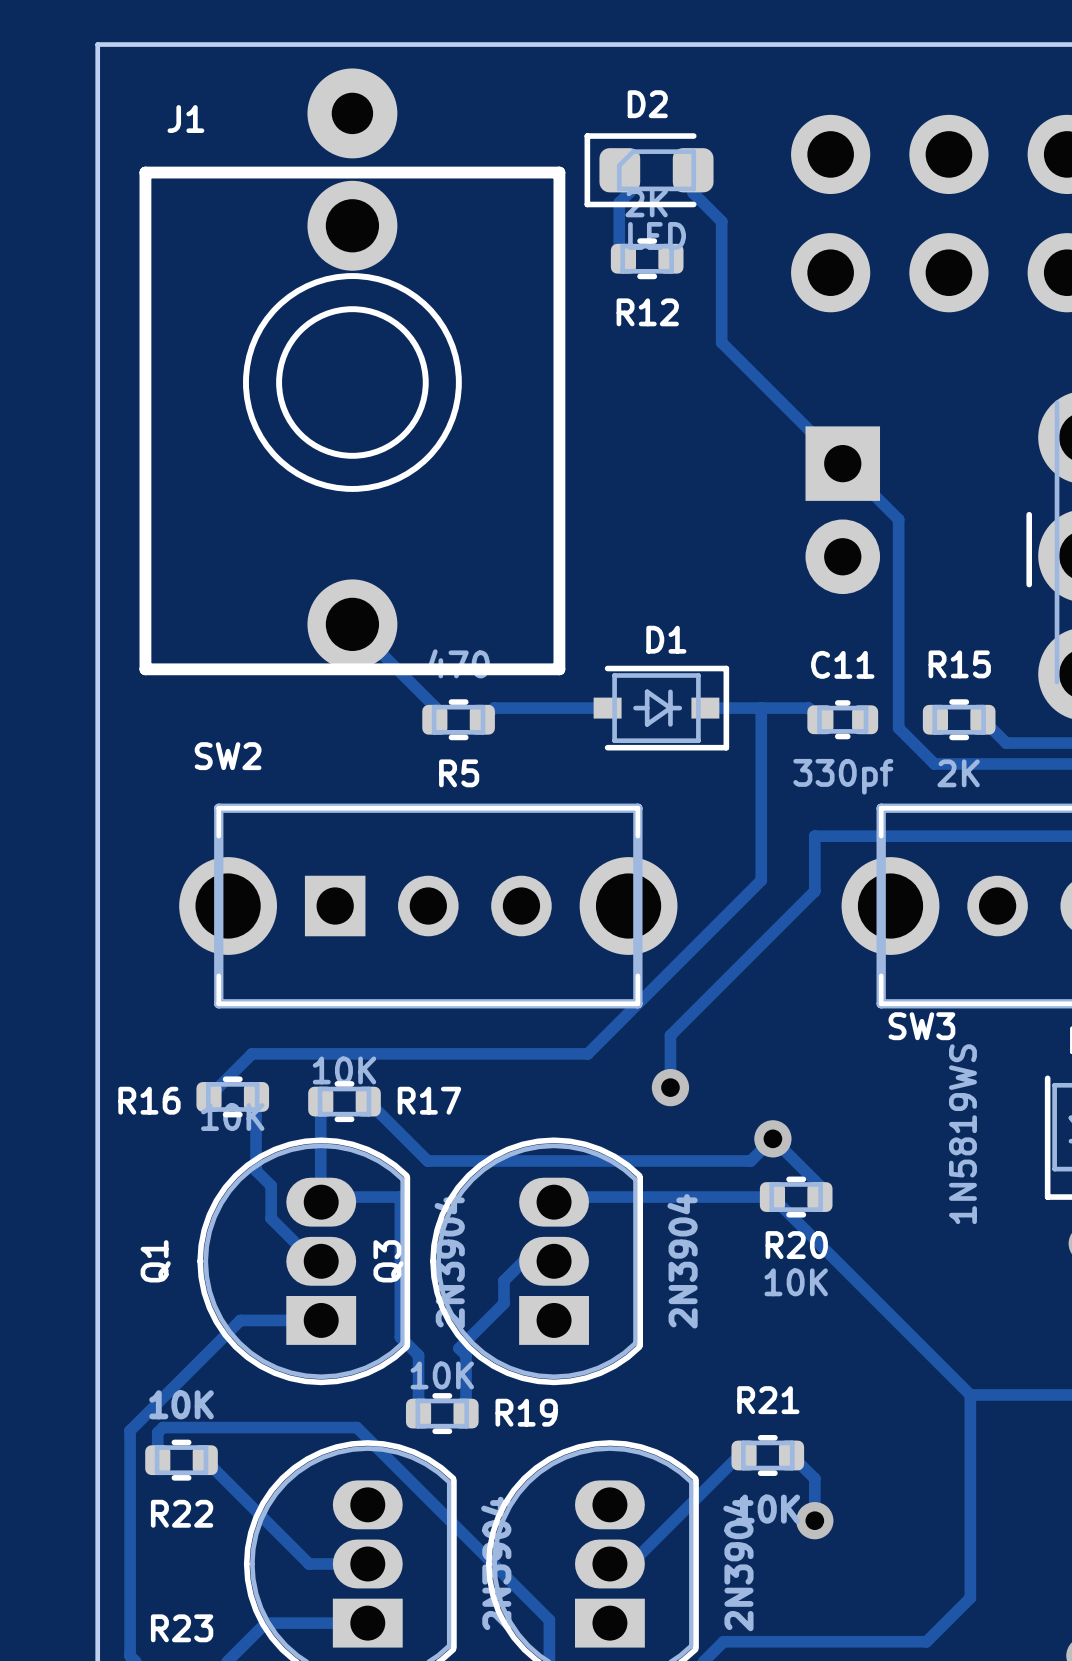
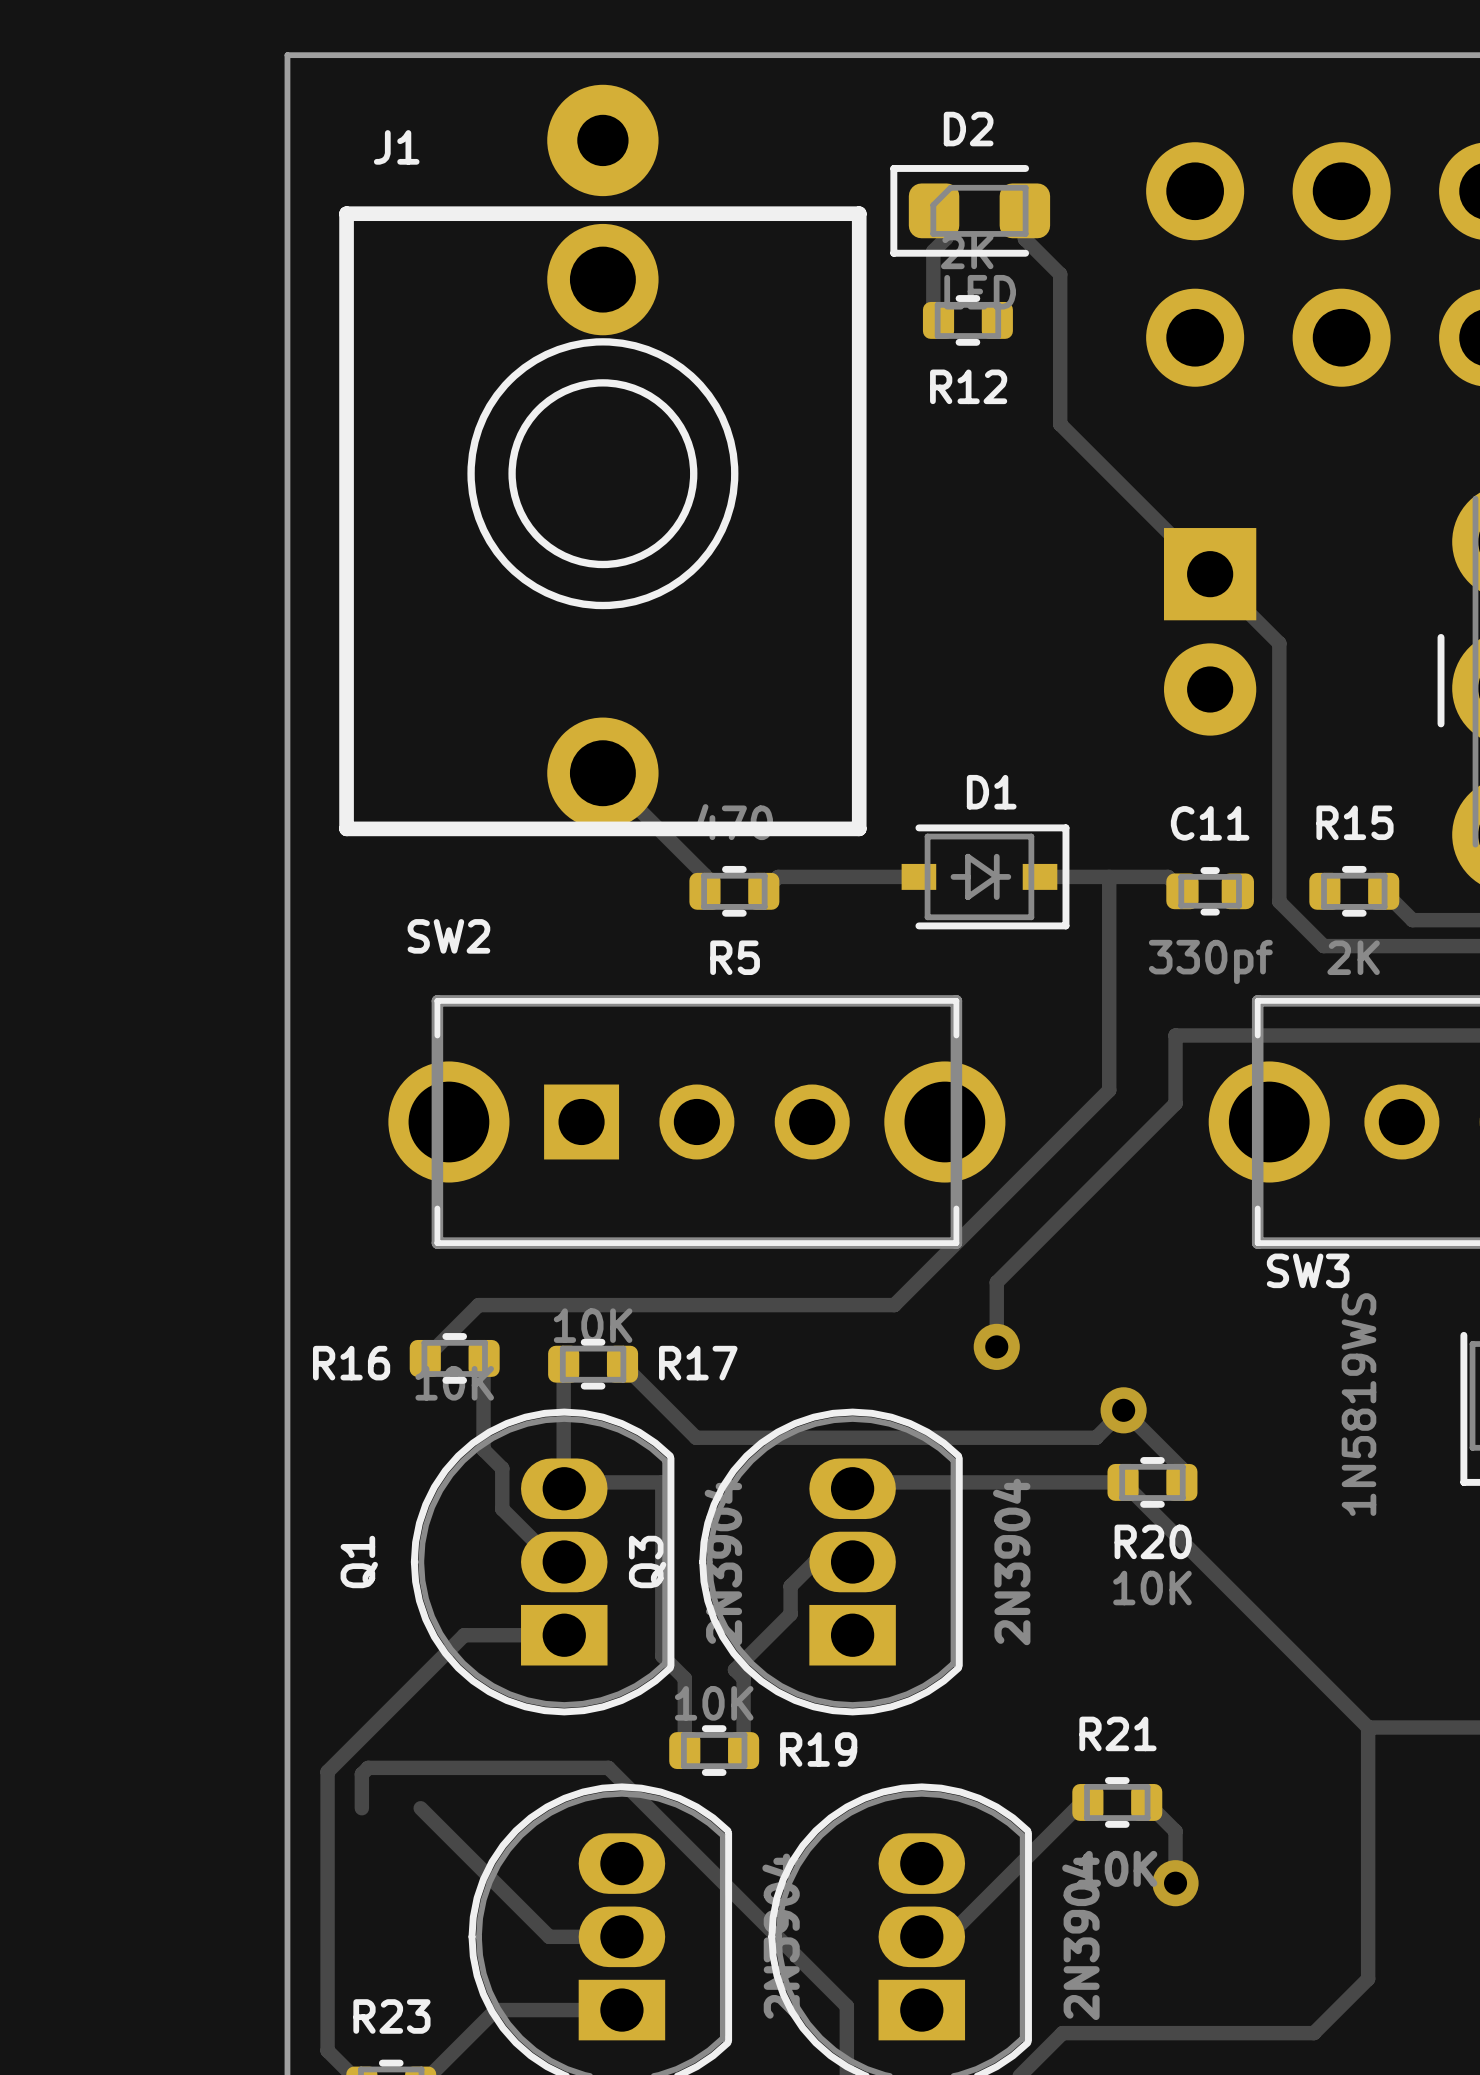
R22: 10K (181, 1460) -> none

